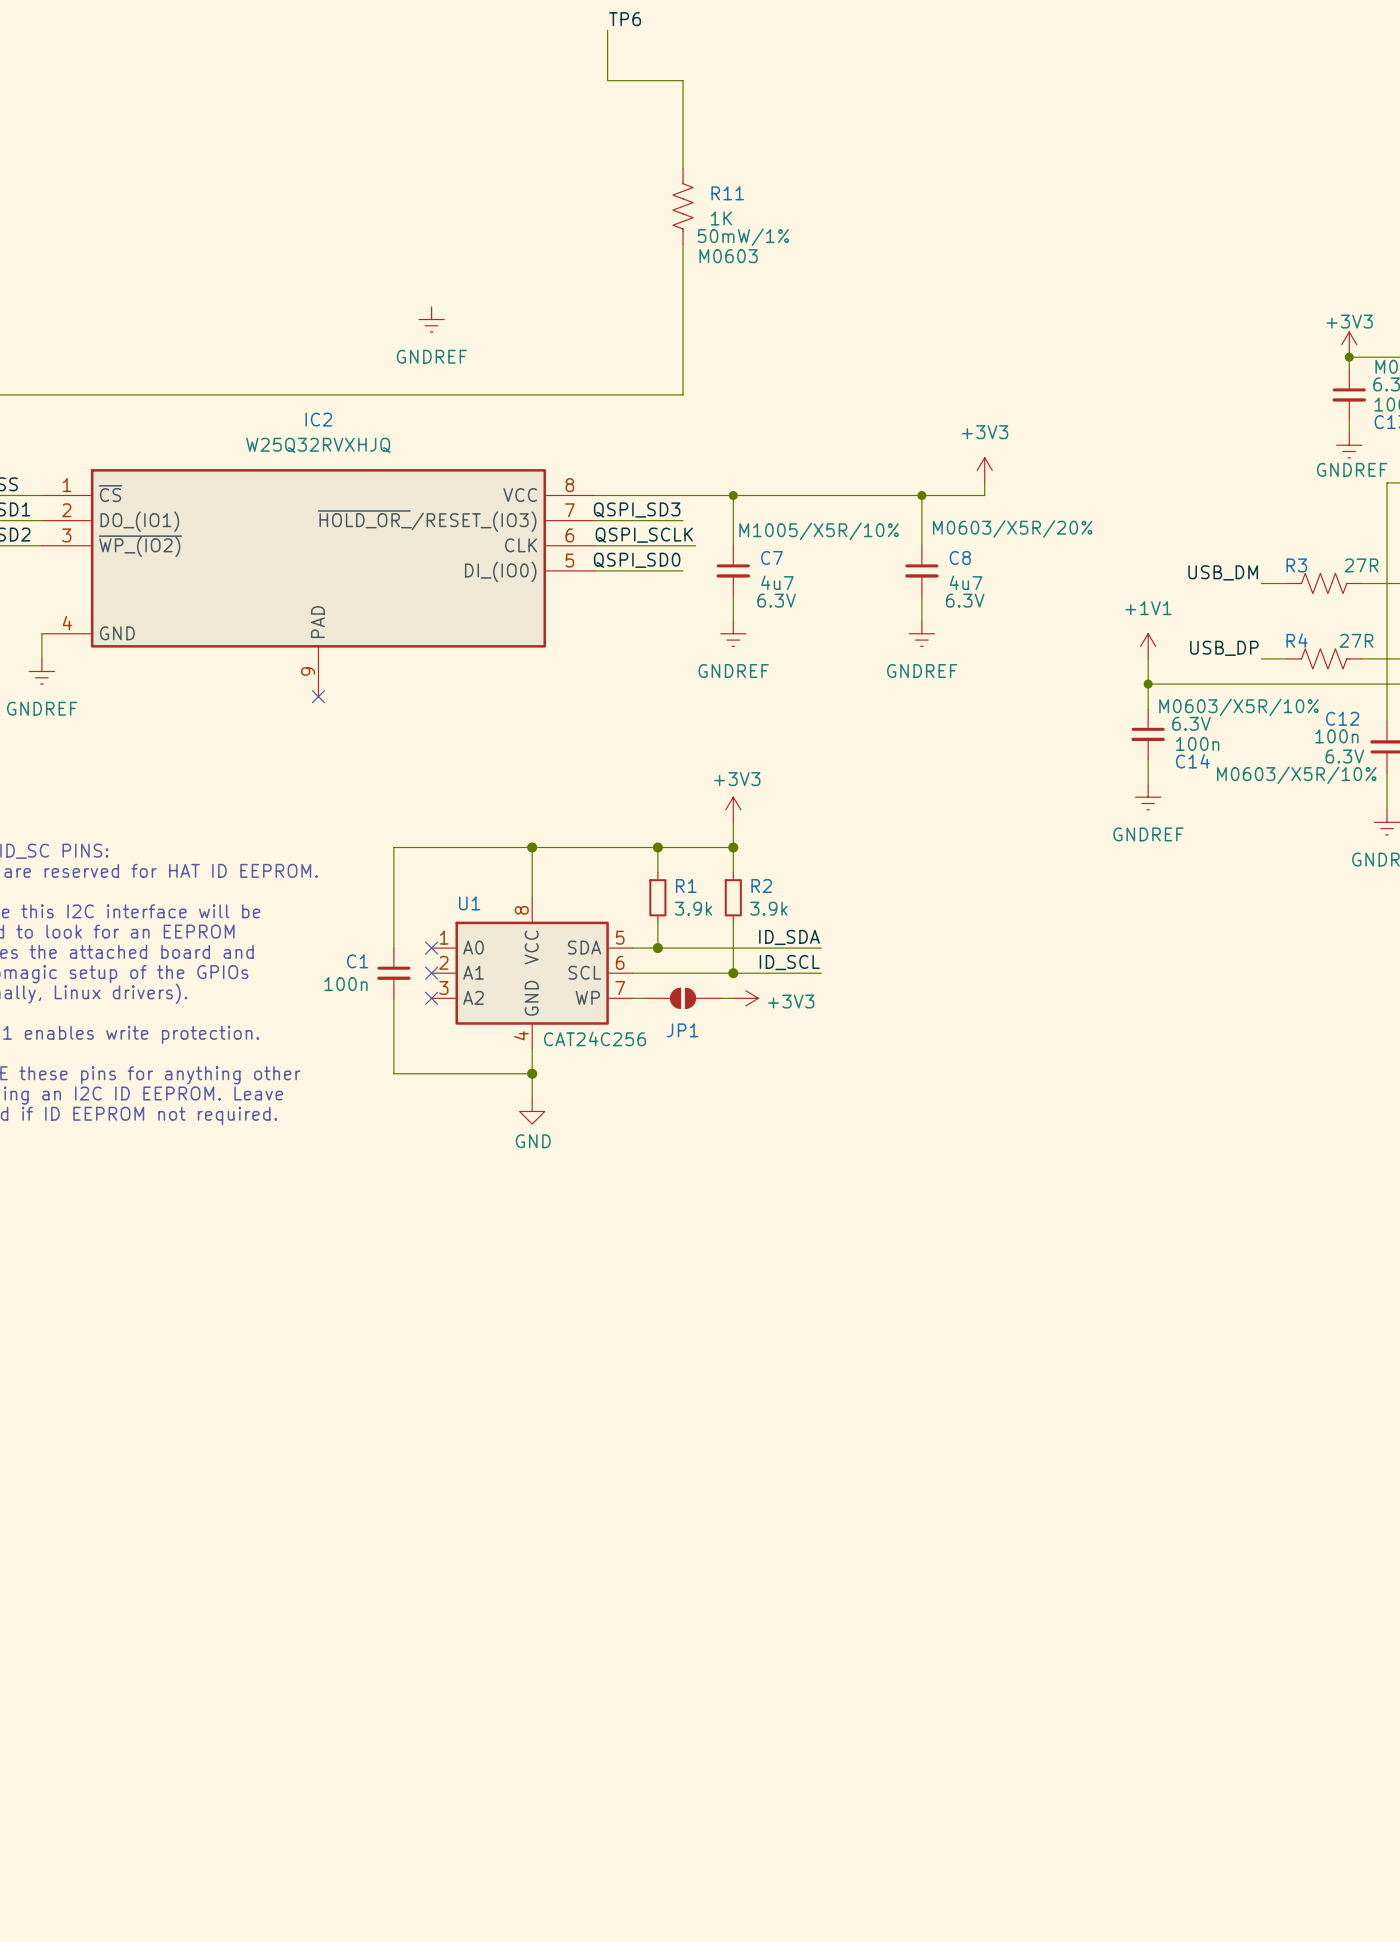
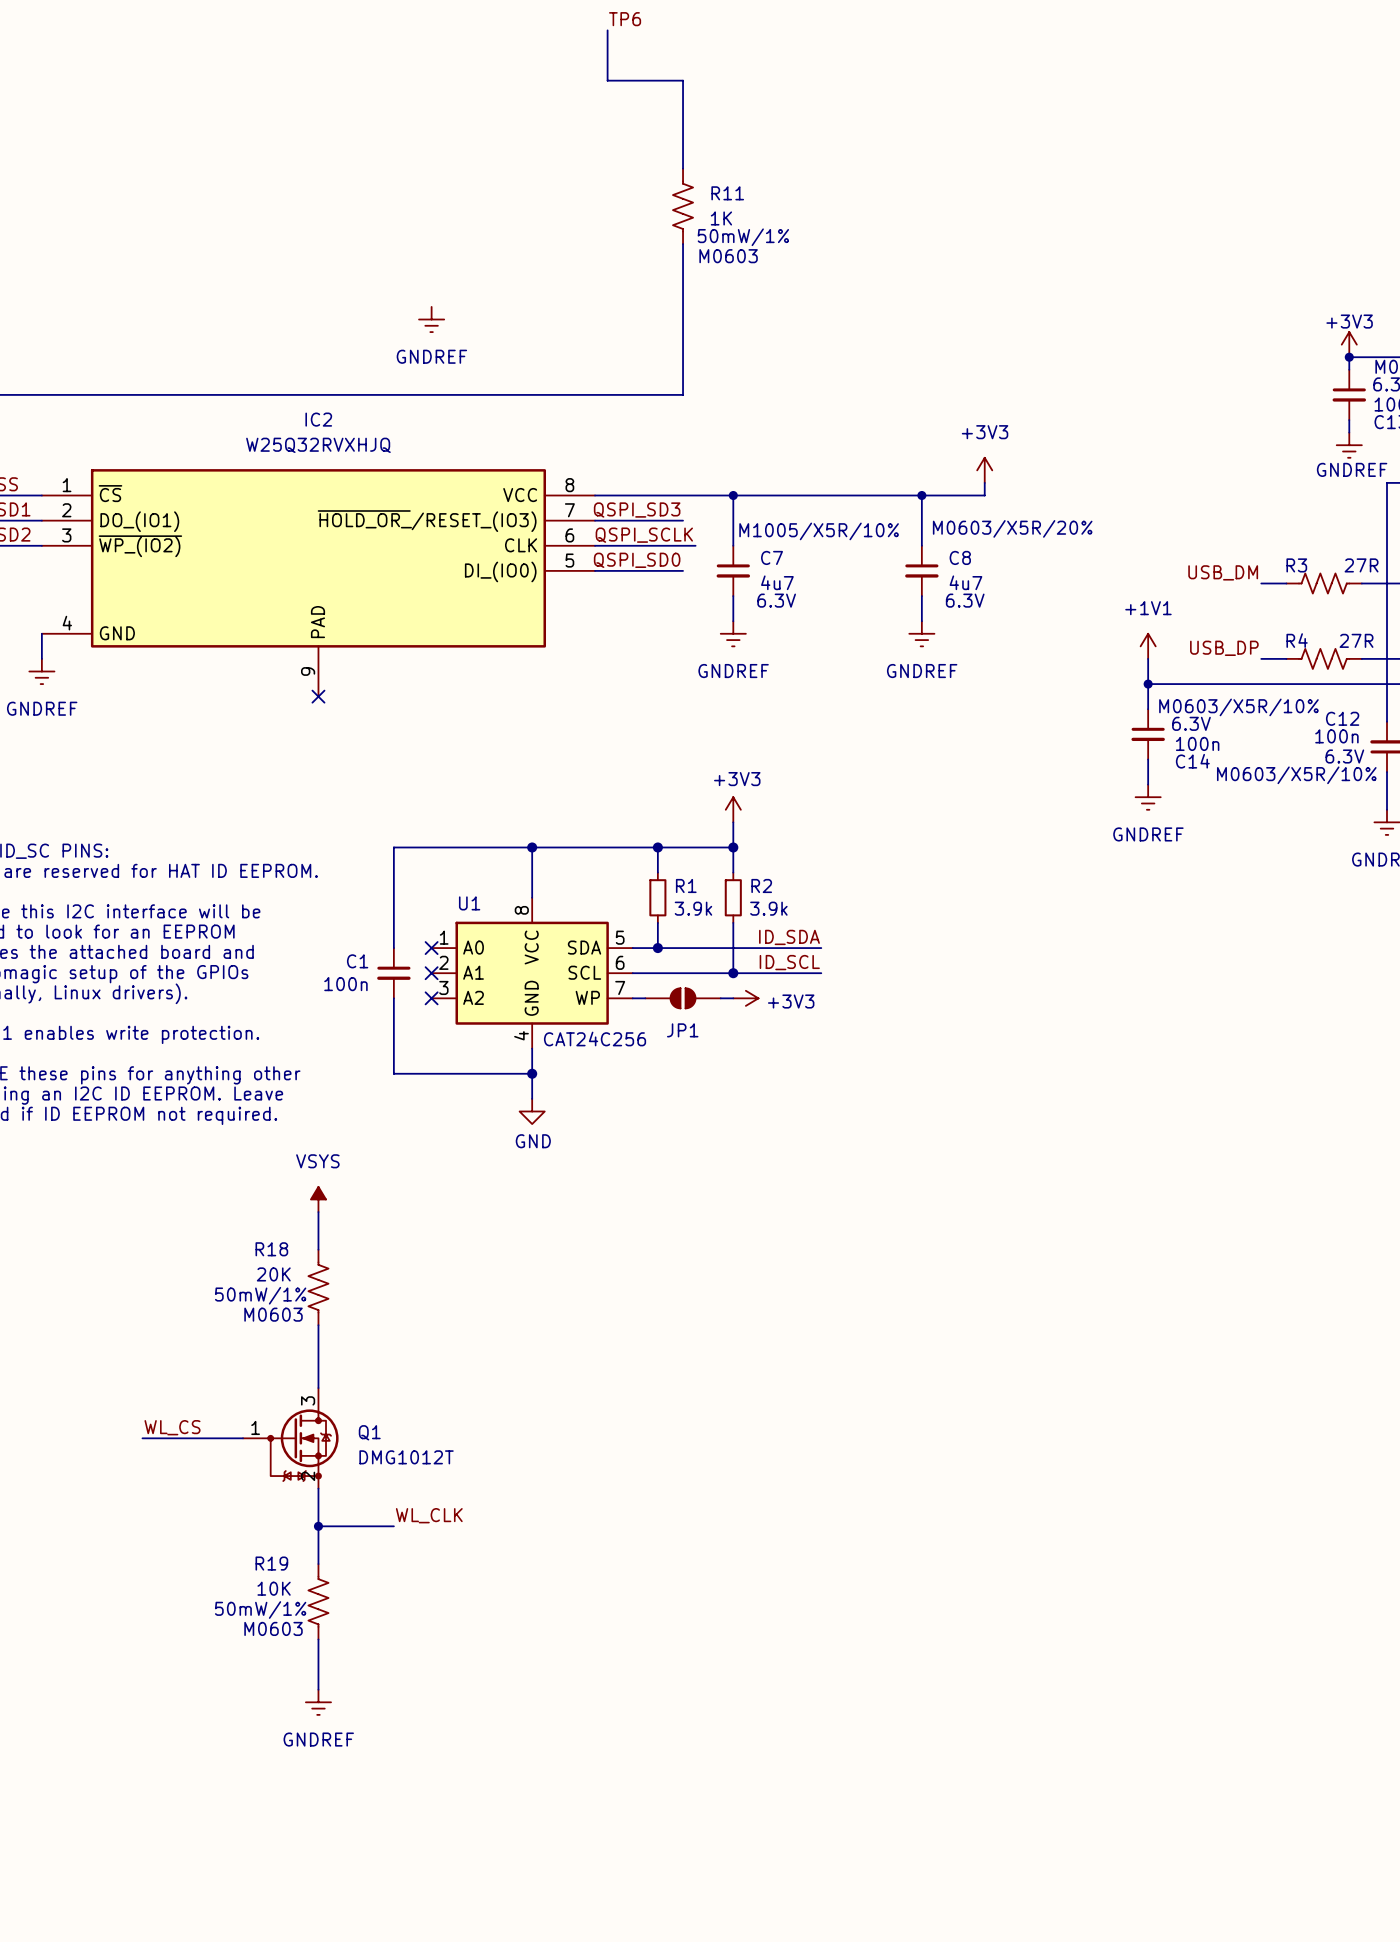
power symbol: none -> VSYS (318, 1199)
wire: none -> (318, 1212) (318, 1249)
R18: none -> 20K (318, 1287)
wire: none -> (318, 1325) (318, 1388)
label: none -> WL_CS (172, 1427)
wire: none -> (142, 1438) (243, 1438)
Q1: none -> DMG1012T (290, 1438)
wire: none -> (318, 1488) (318, 1564)
label: none -> WL_CLK (429, 1515)
wire: none -> (318, 1526) (393, 1526)
junction: none -> (318, 1526)
R19: none -> 10K (318, 1601)
wire: none -> (318, 1639) (318, 1689)
power symbol: none -> GNDREF (318, 1702)

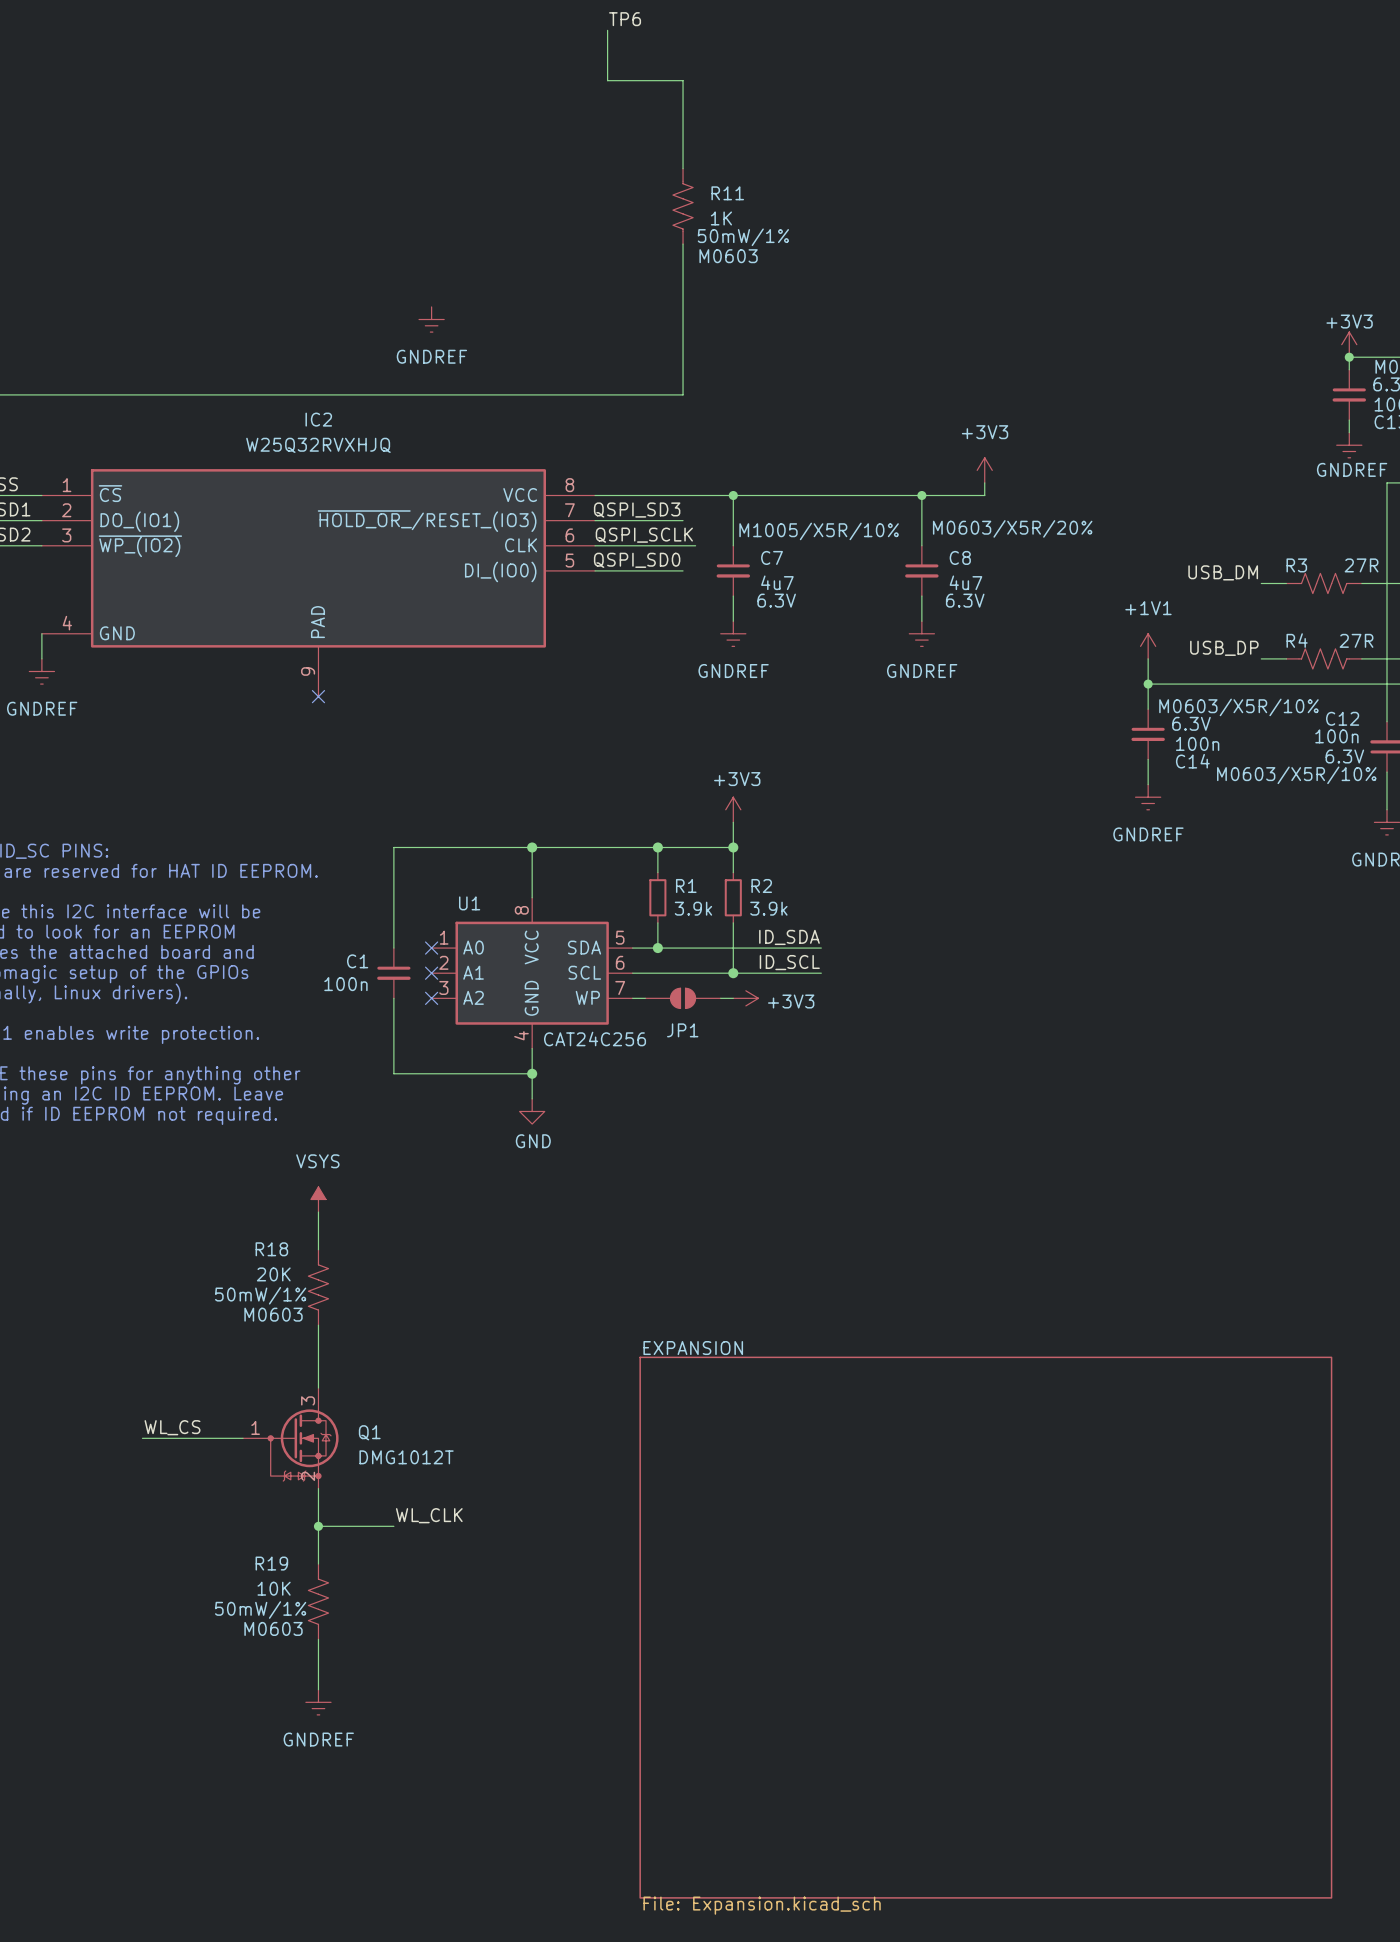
sheet EXPANSION: none -> File: Expansion.kicad_sch (985, 1627)

